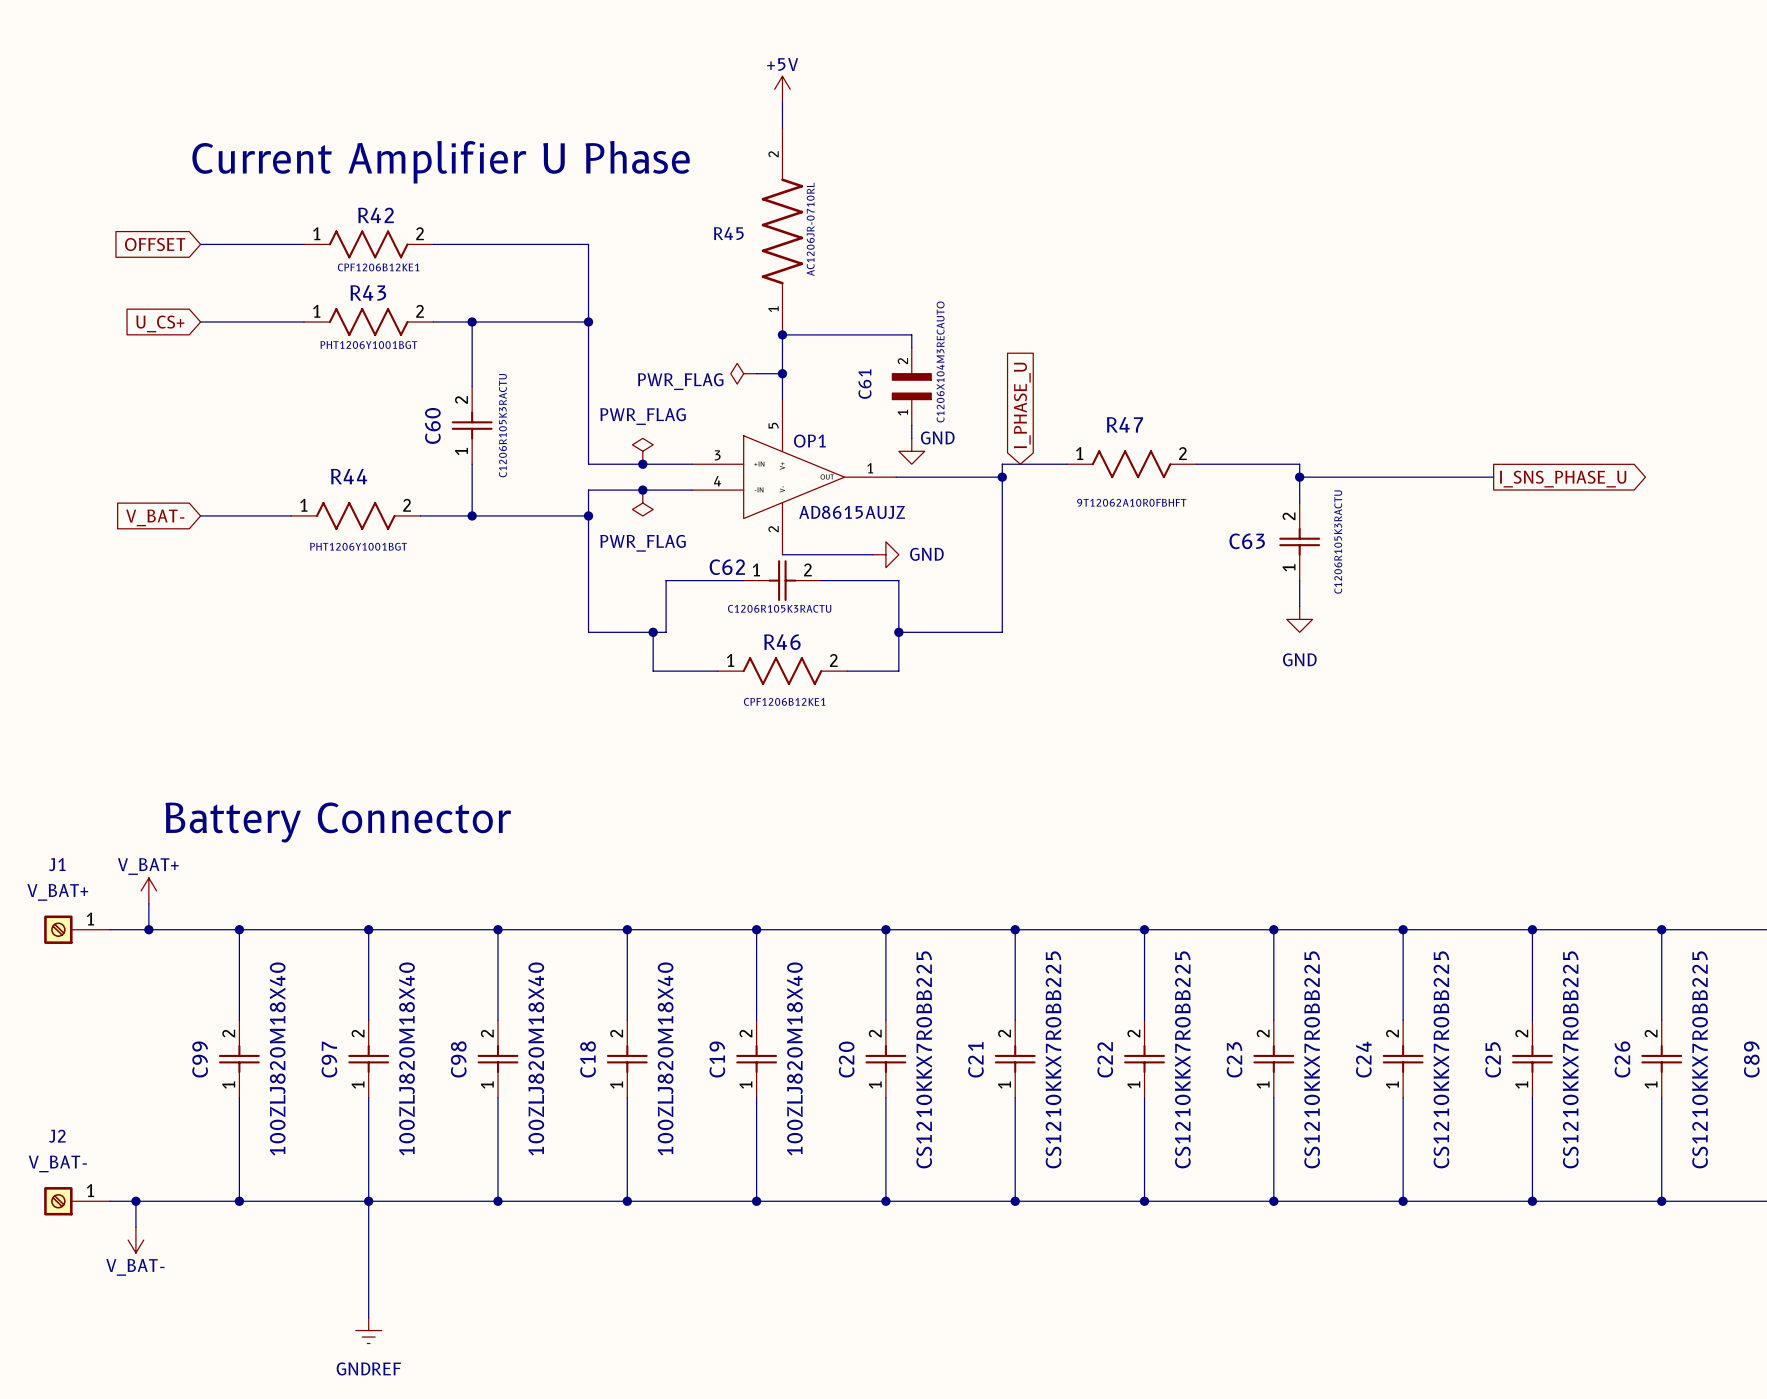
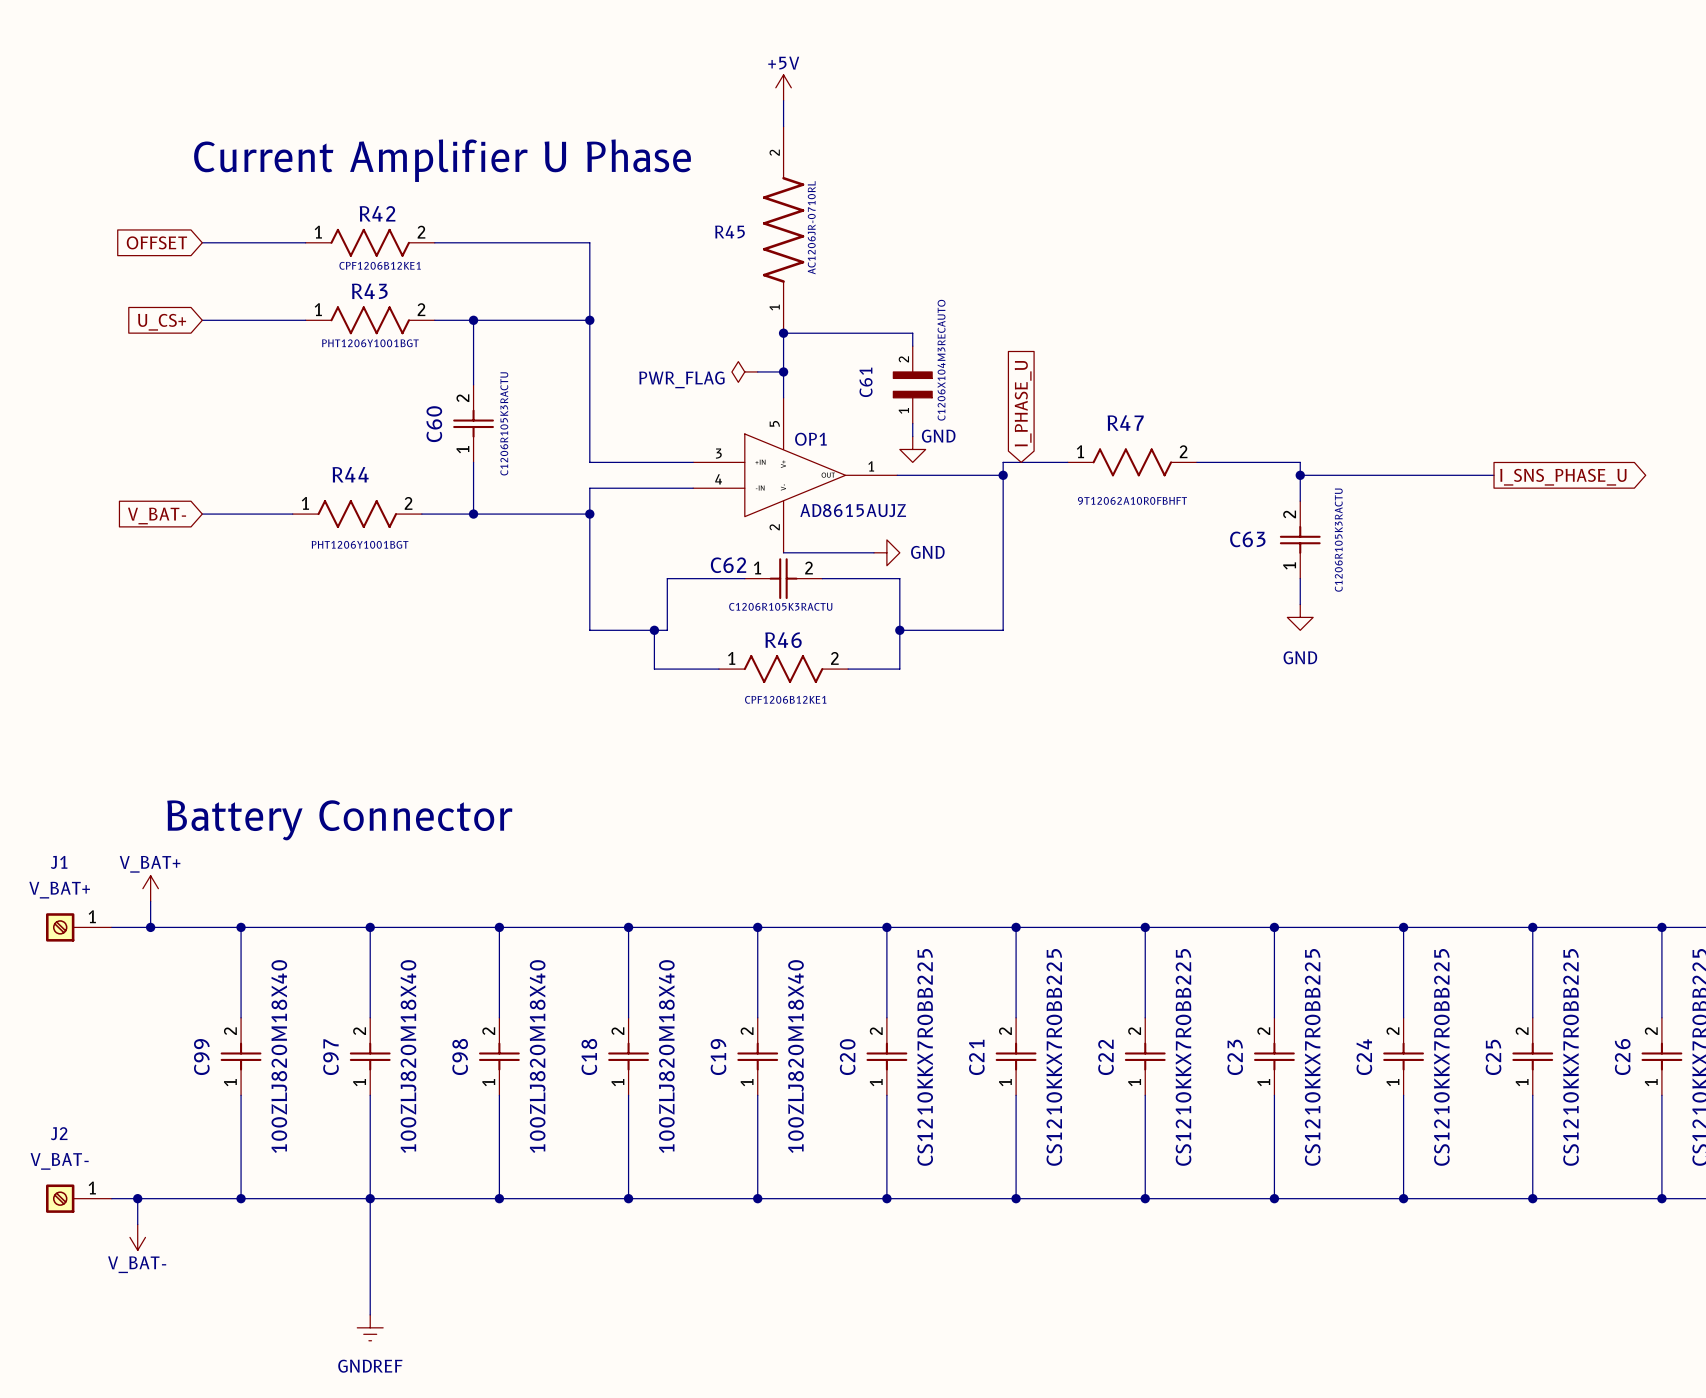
power symbol: PWR_FLAG (642, 451) -> none
junction: (642, 464) -> none
junction: (642, 490) -> none
power symbol: PWR_FLAG (642, 503) -> none

